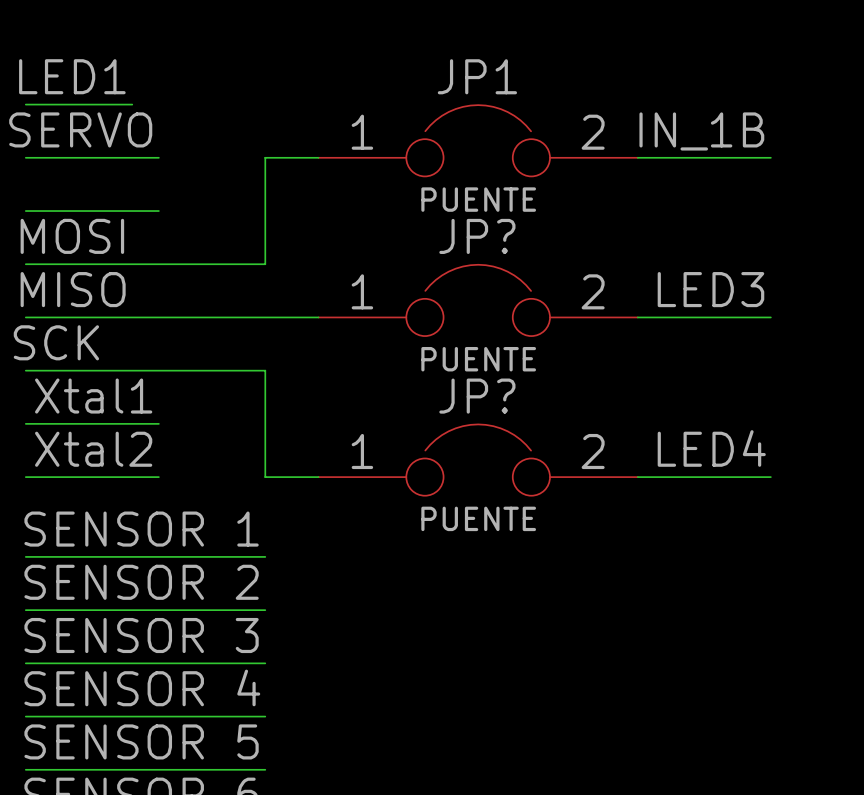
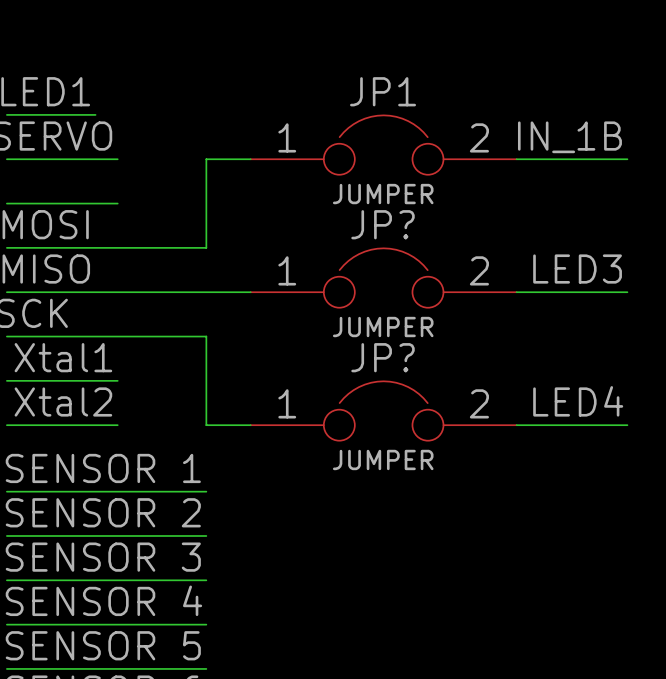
JP1 value: PUENTE (478, 199) -> JUMPER (383, 194)
JP? value: PUENTE (478, 359) -> JUMPER (383, 327)
JP? value: PUENTE (478, 518) -> JUMPER (383, 459)

